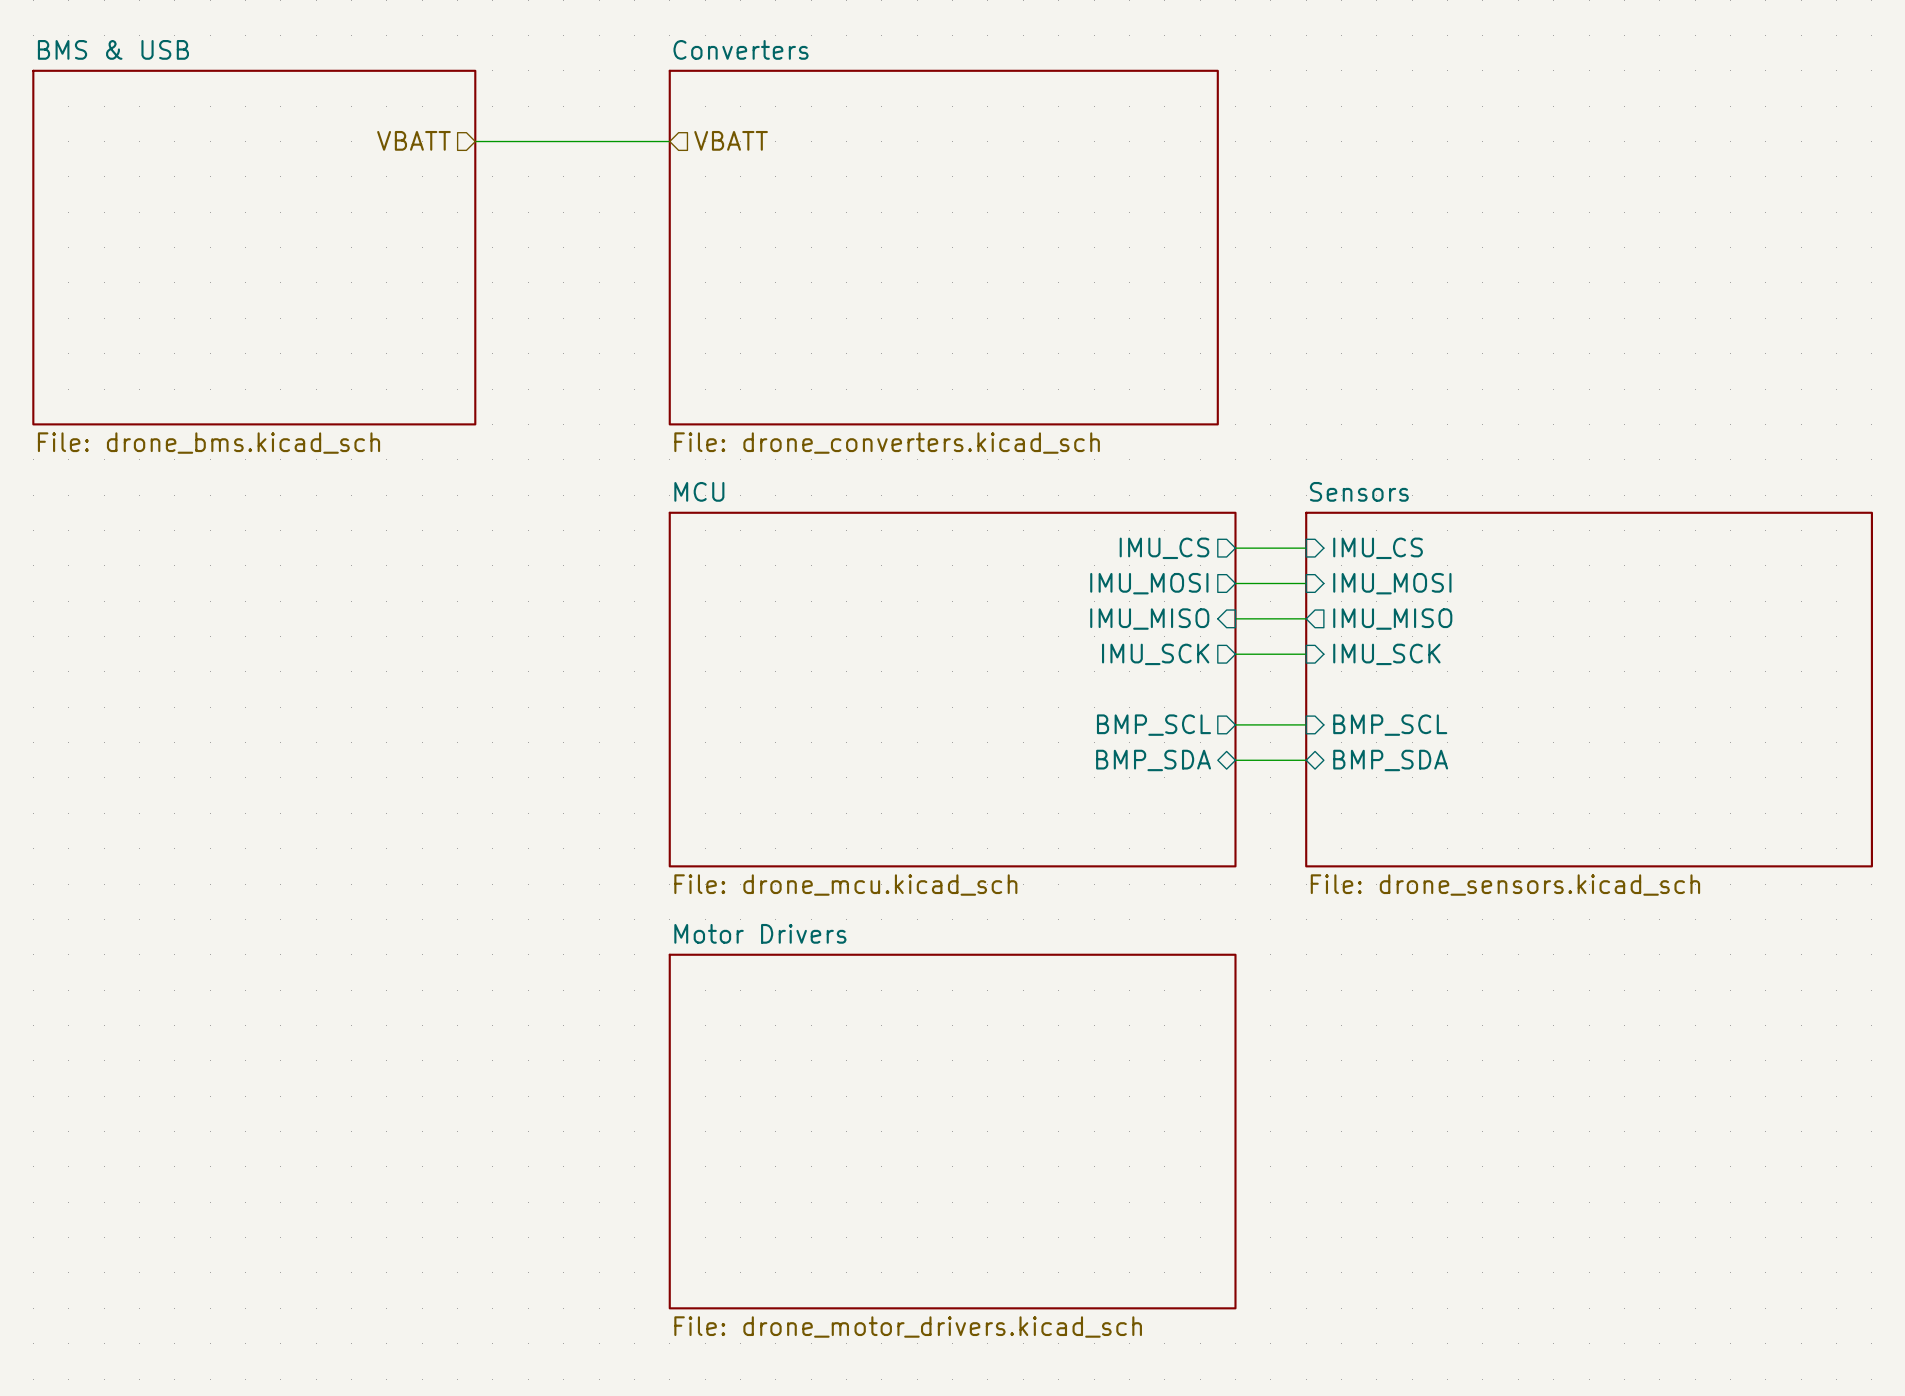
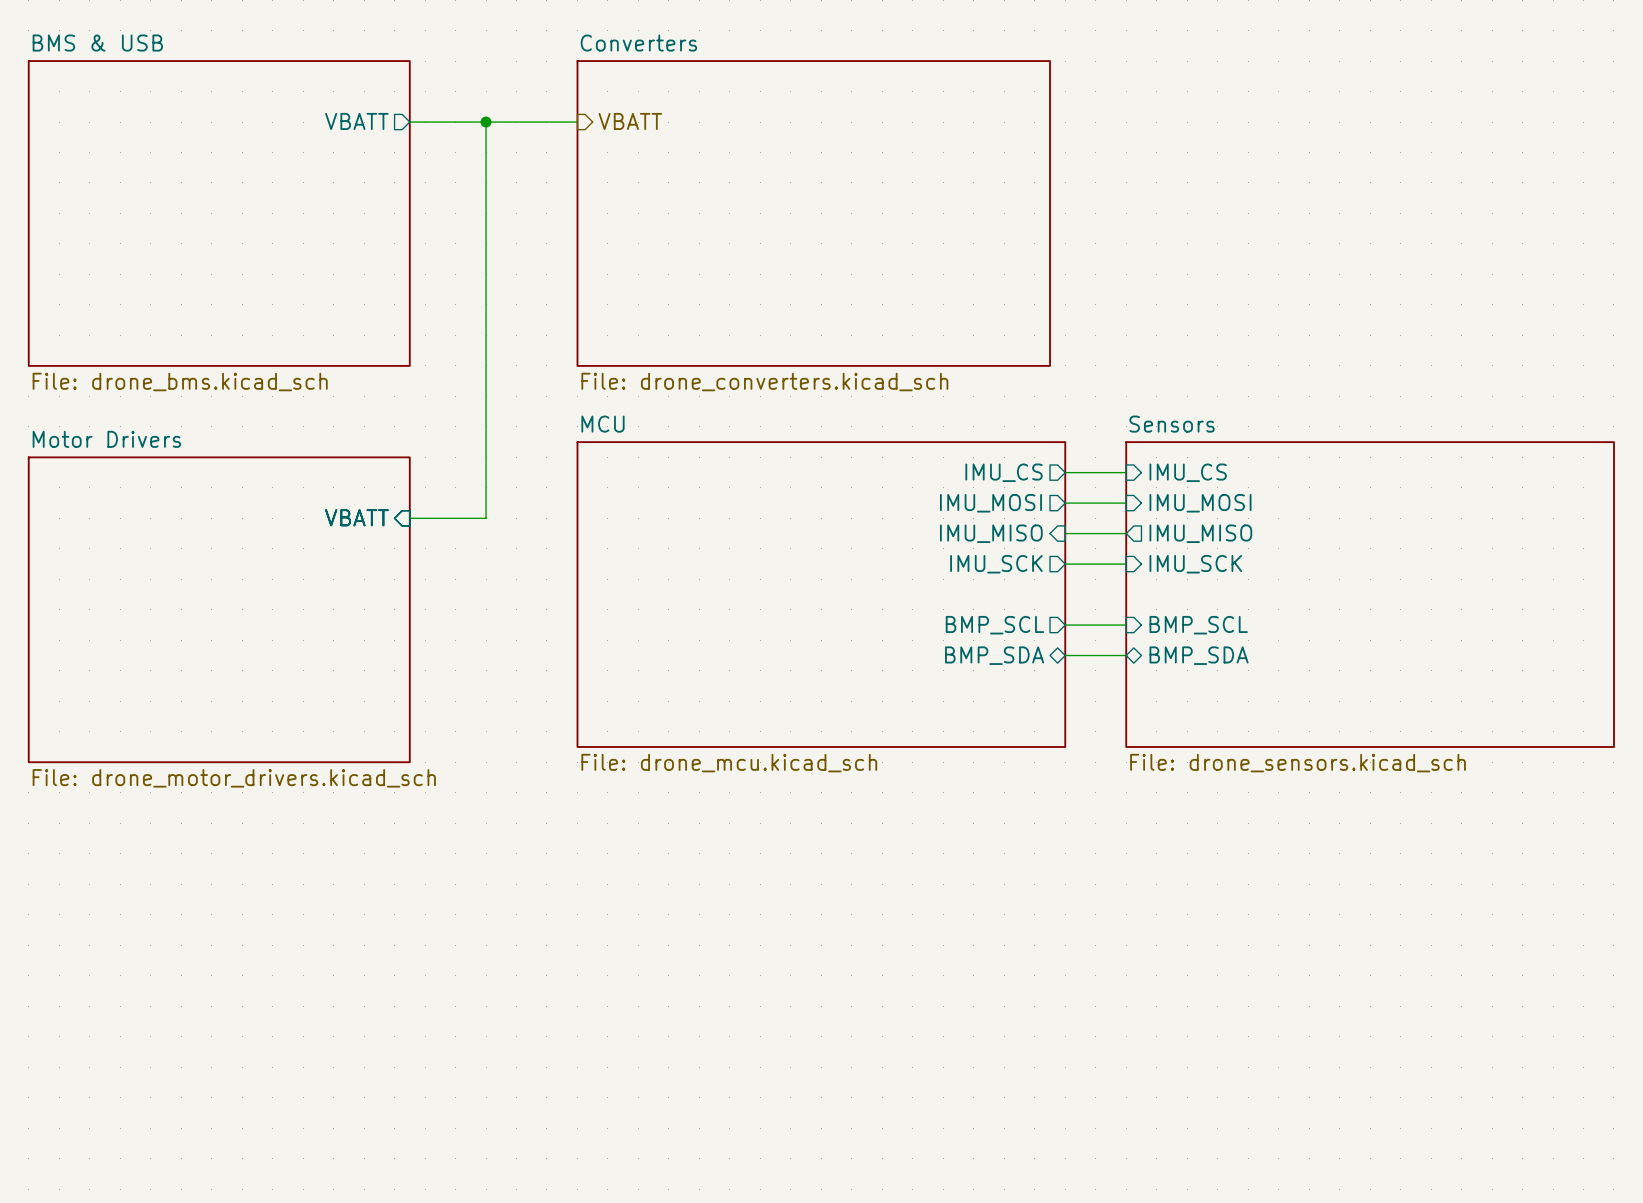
hierarchical label: VBATT (413, 140) -> none
sheet pin: none -> VBATT (356, 121)
hierarchical label shape: input (731, 140) -> output (630, 121)
wire: none -> (486, 122) (486, 518) (409, 518)
junction: none -> (486, 122)
sheet pin: none -> VBATT (356, 517)
sheet Motor Drivers: none -> File: drone_motor_drivers.kicad_sch (219, 609)
sheet Motor Drivers: File: drone_motor_drivers.kicad_sch (952, 1131) -> none

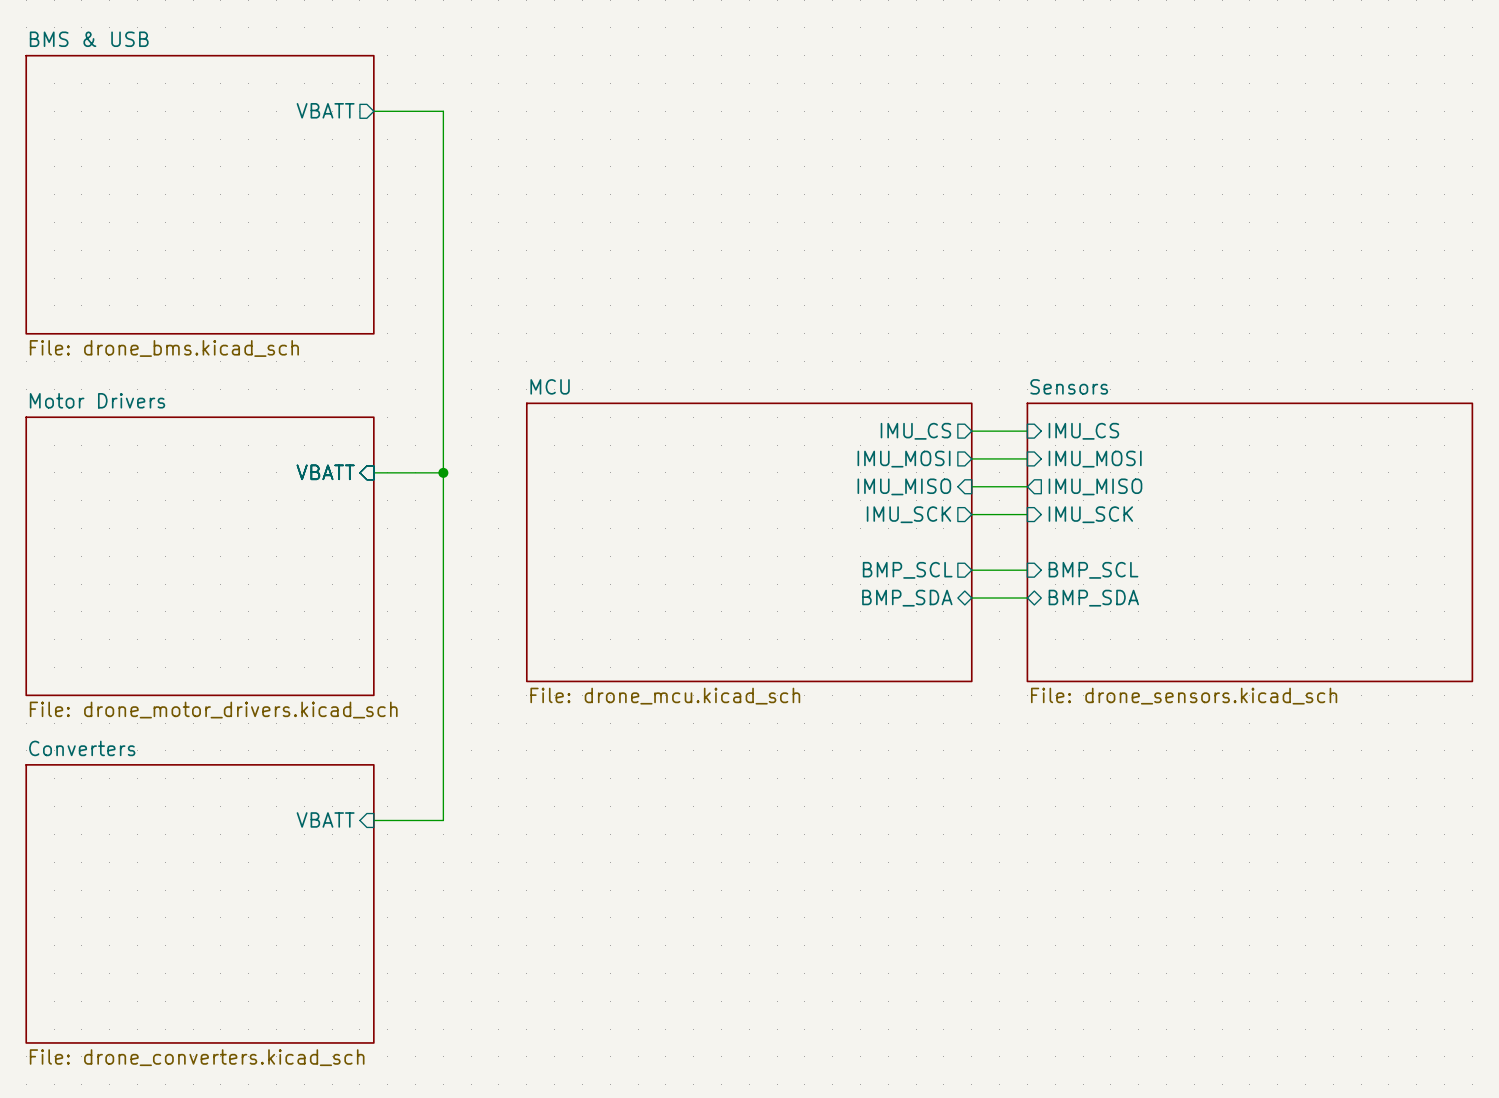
hierarchical label: VBATT (630, 121) -> none
wire: (486, 122) (577, 122) -> none
junction: (486, 122) -> none
sheet Converters: File: drone_converters.kicad_sch (813, 213) -> none
wire: none -> (443, 472) (443, 820) (373, 820)
junction: none -> (443, 472)
sheet pin: none -> VBATT (325, 819)
sheet Converters: none -> File: drone_converters.kicad_sch (200, 903)

